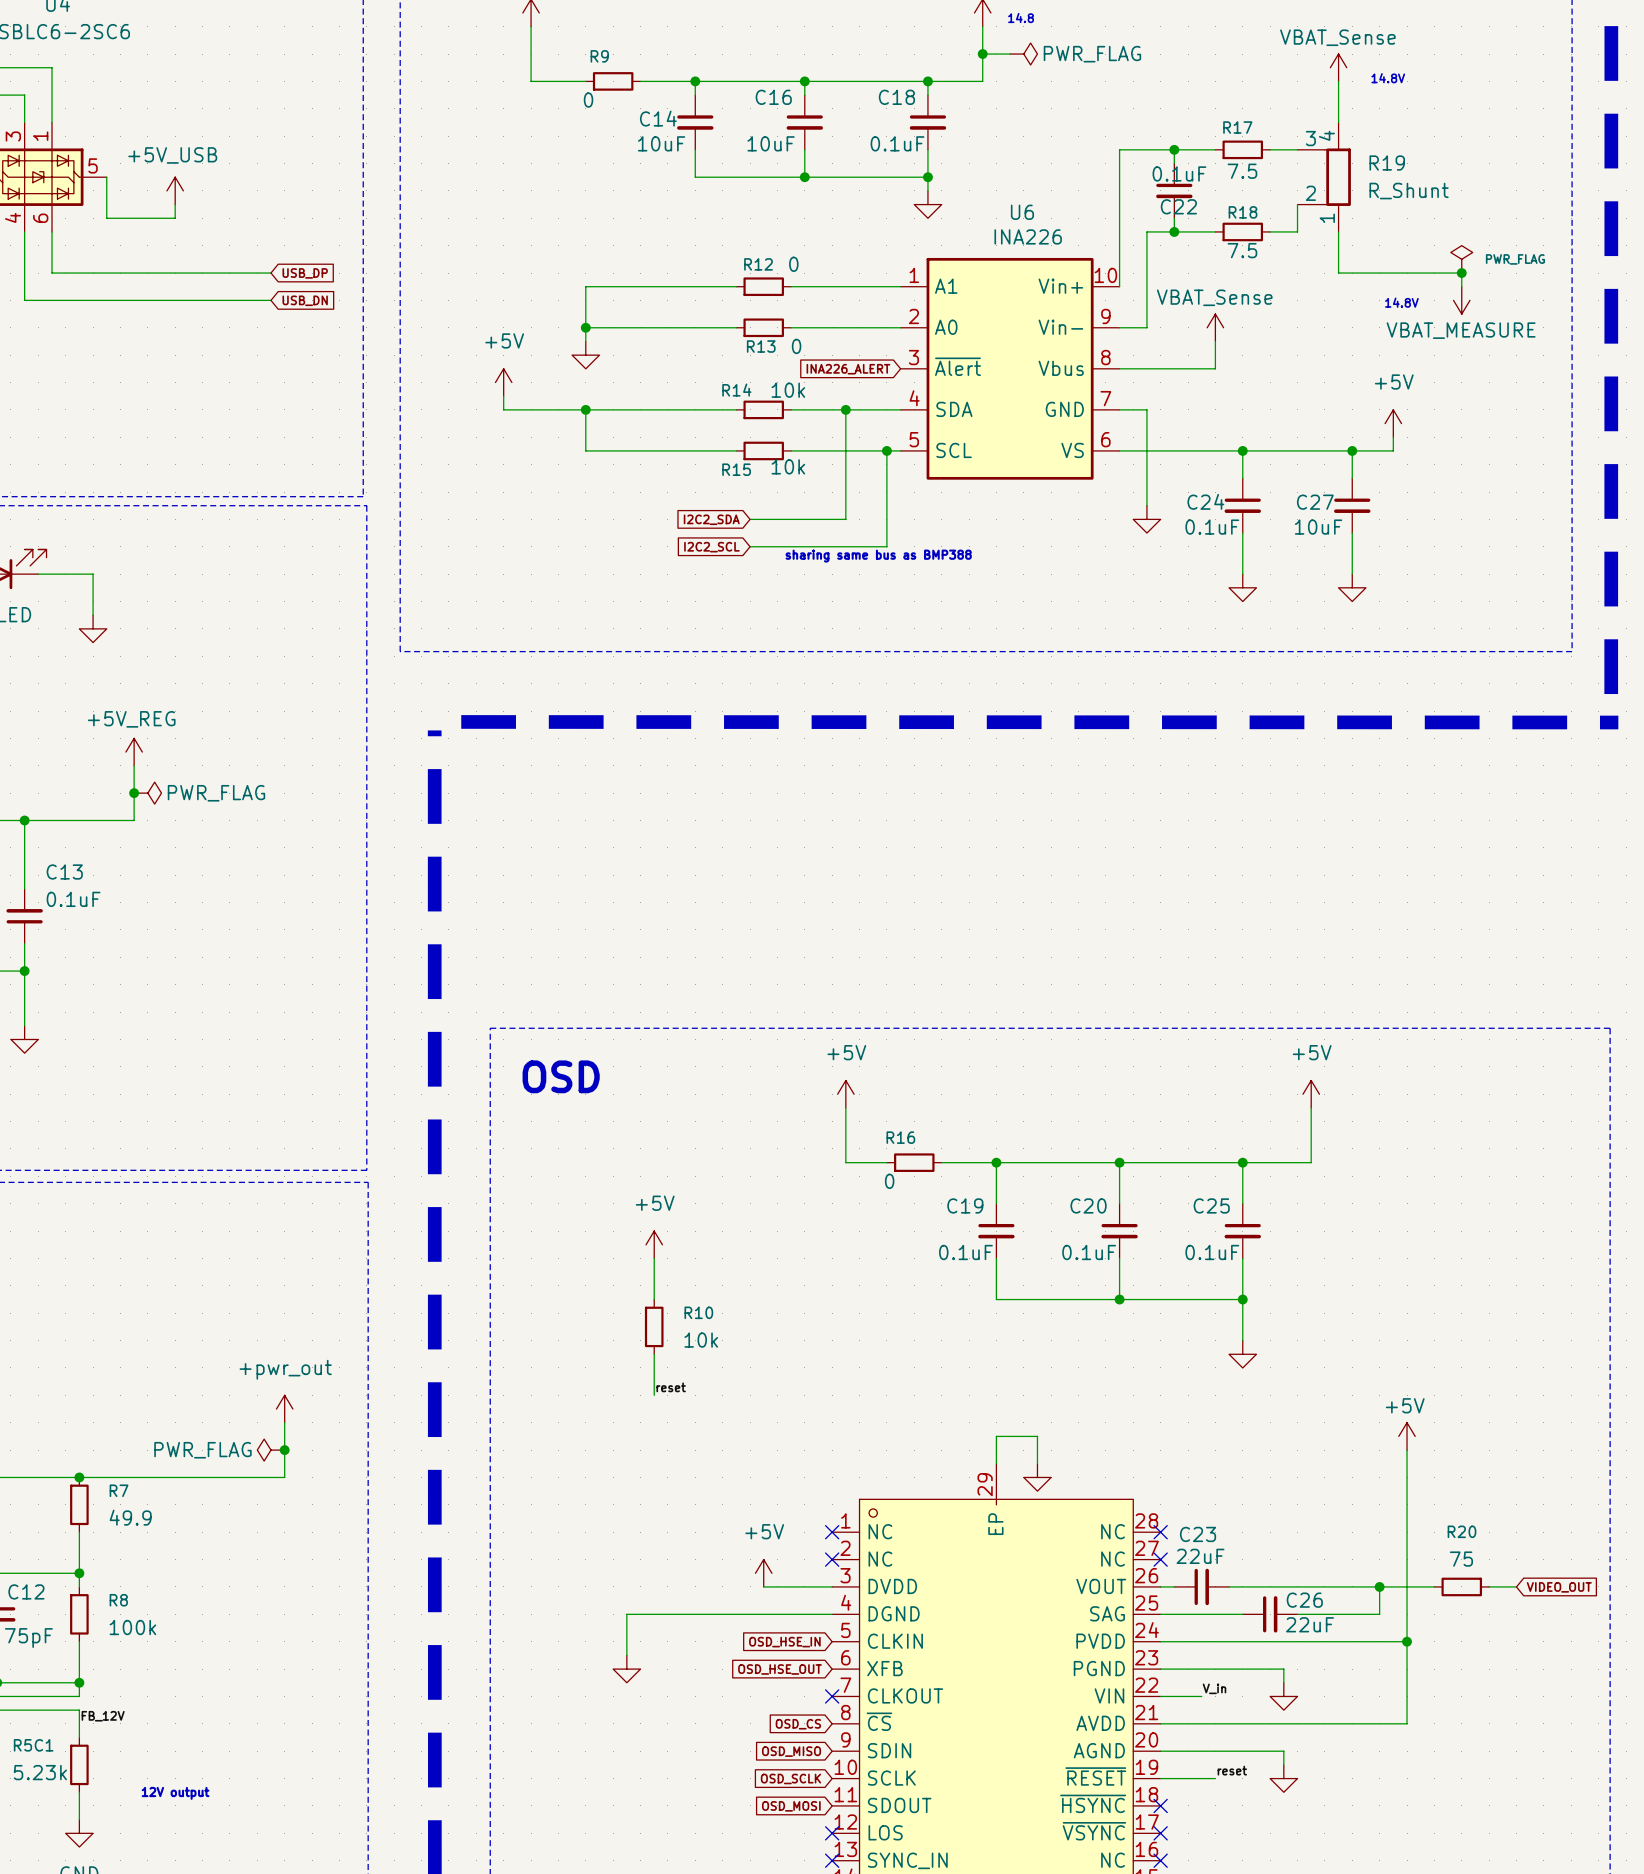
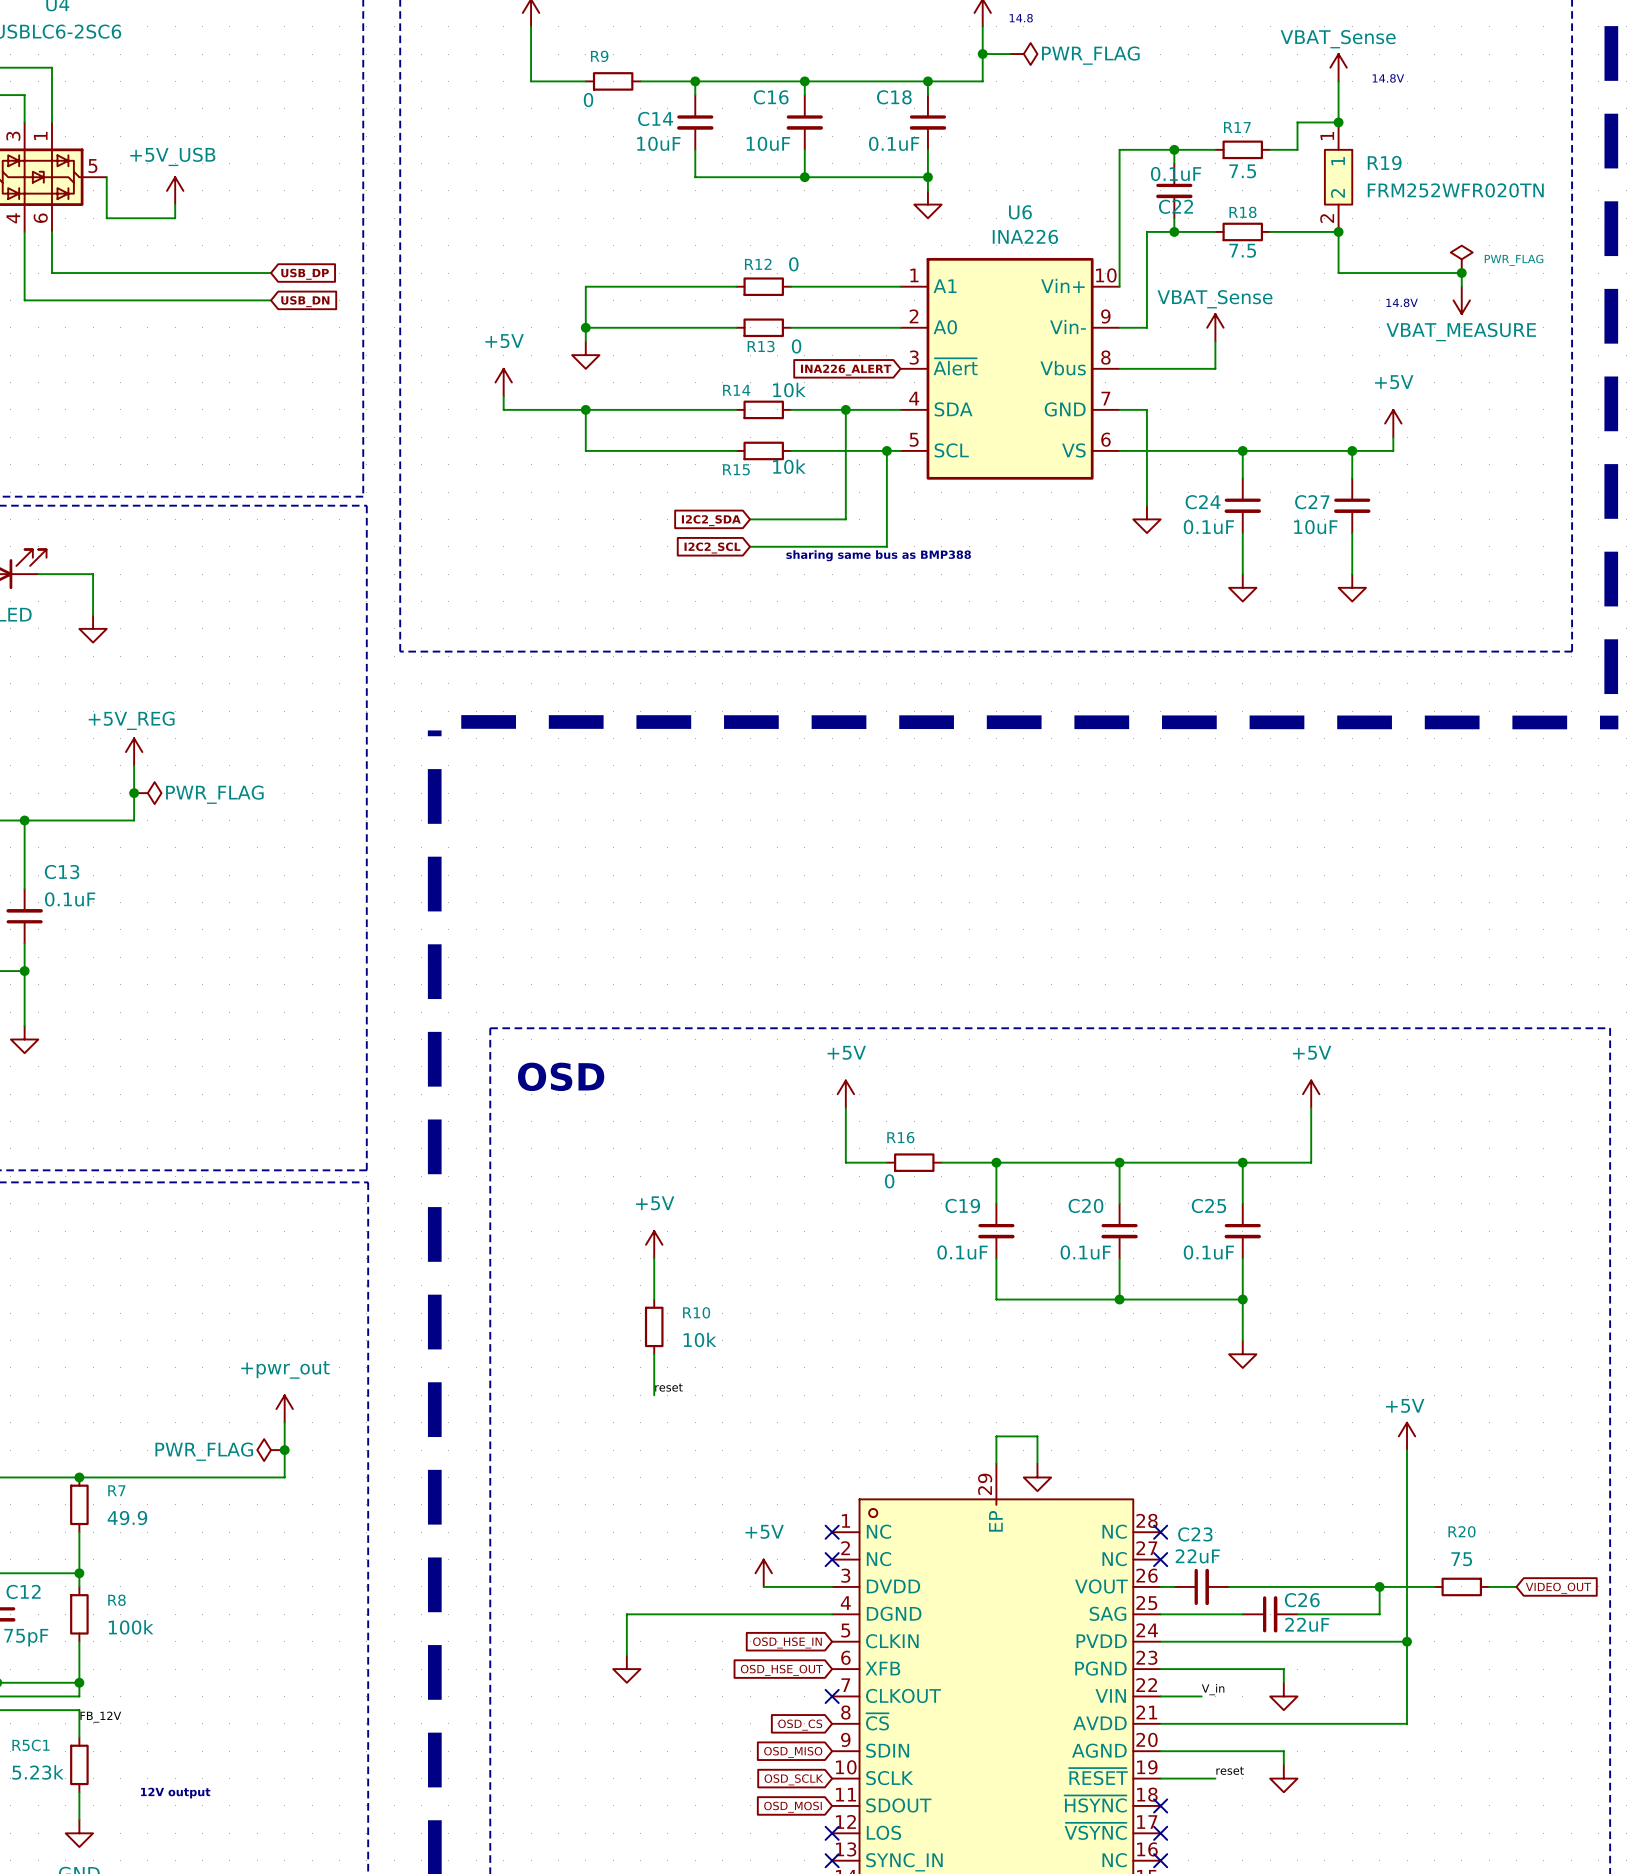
R19 symbol: [1297, 122, 1351, 232] -> [1324, 122, 1353, 232]
wire: none -> (1338, 122) (1297, 122) (1297, 149)
junction: none -> (1338, 122)
R19 value: R_Shunt (1409, 191) -> FRM252WFR020TN (1455, 190)
wire: (1297, 204) (1297, 231) -> (1338, 231) (1297, 231)
junction: none -> (1338, 231)

